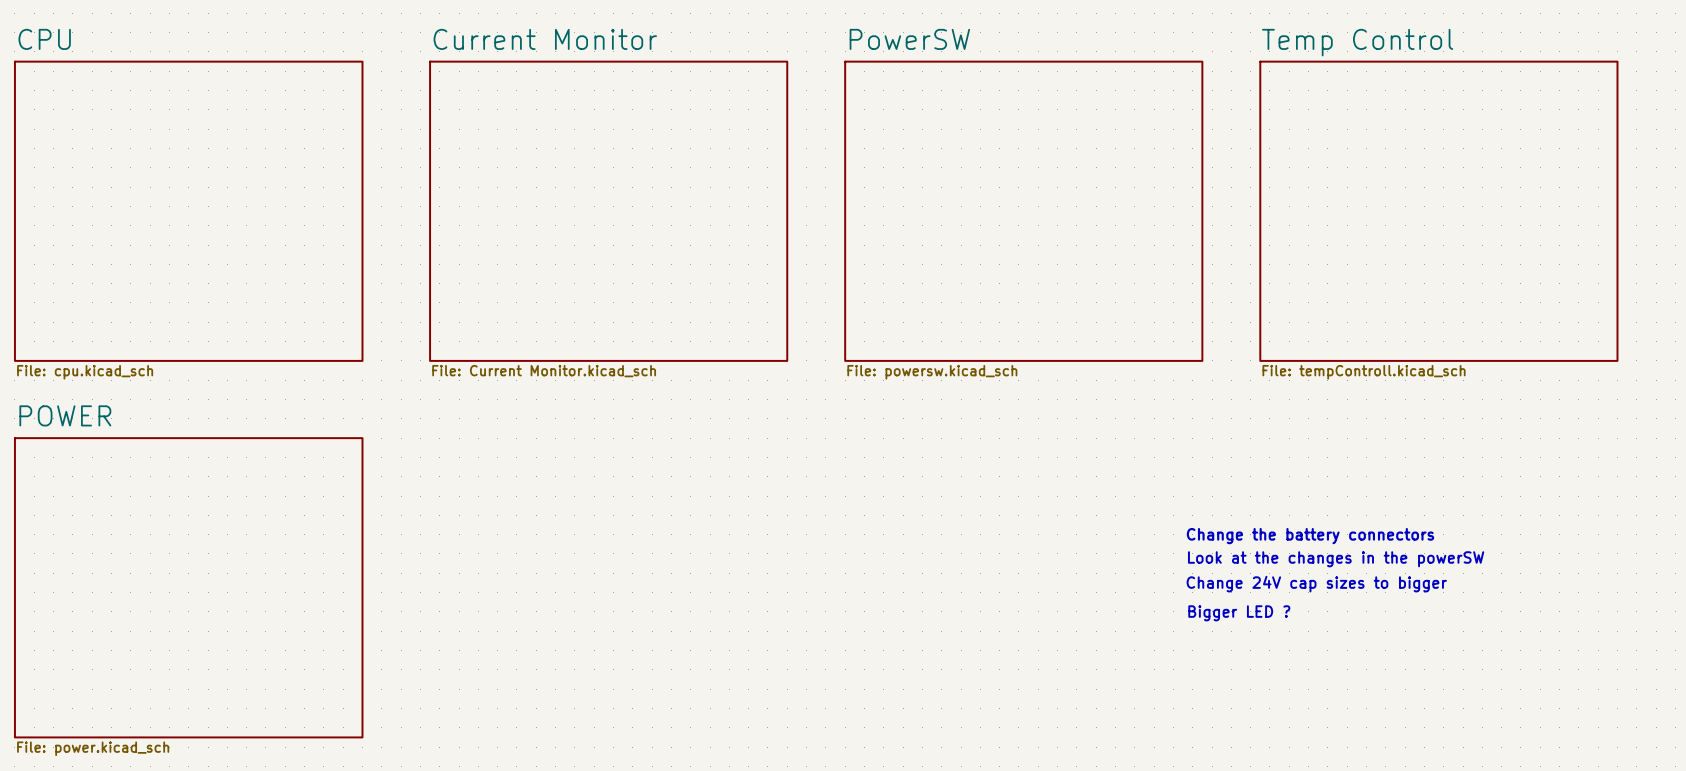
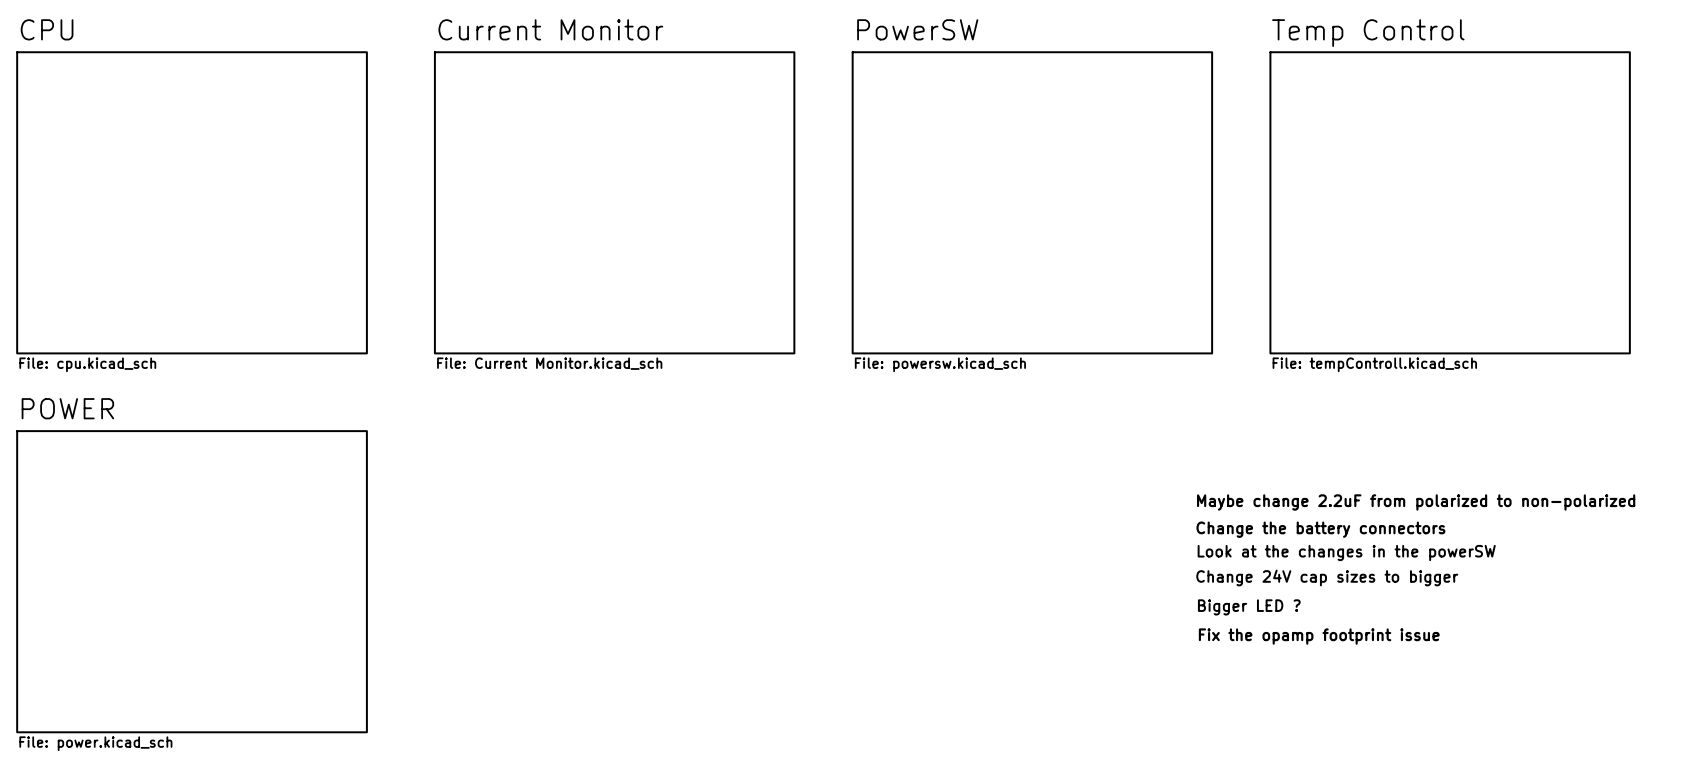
text: none -> Maybe change 2.2uF from polarized to non-polarized (1416, 502)
text: none -> Fix the opamp footprint issue (1319, 636)

